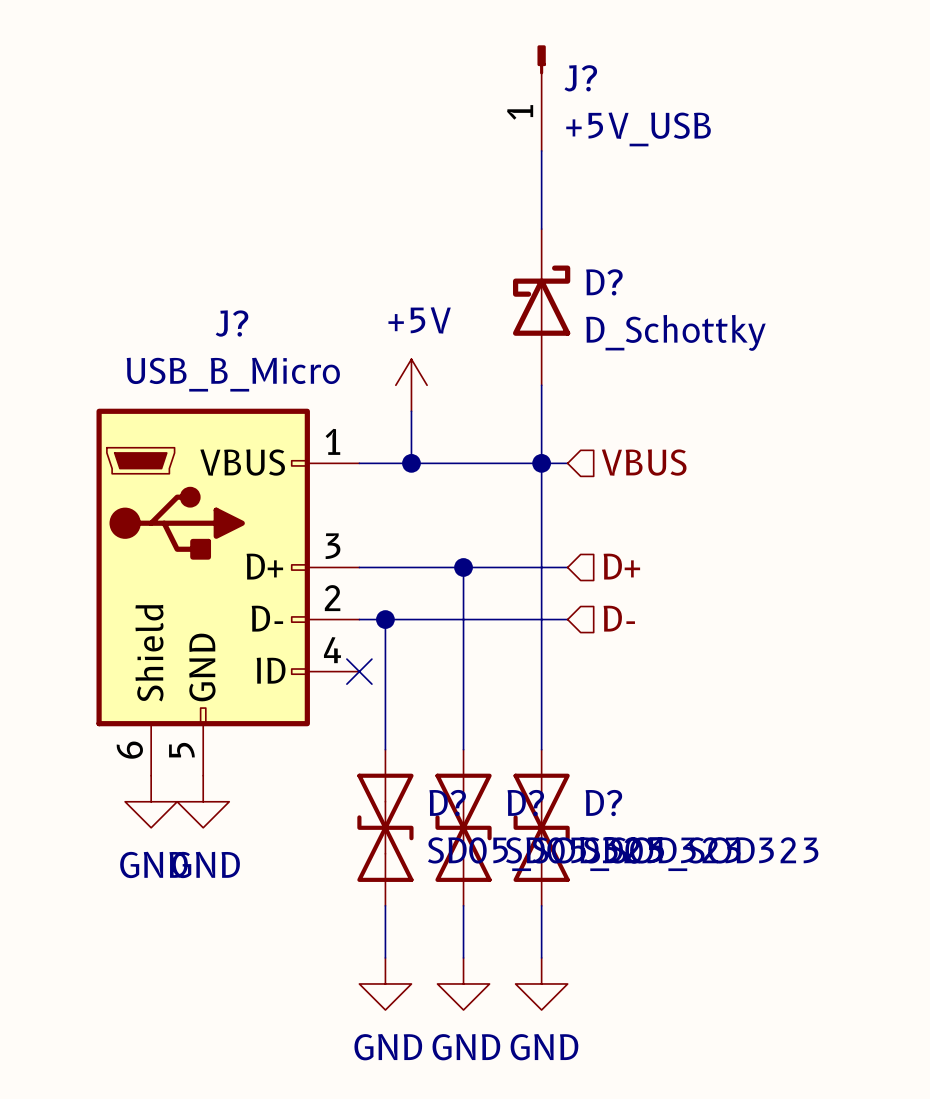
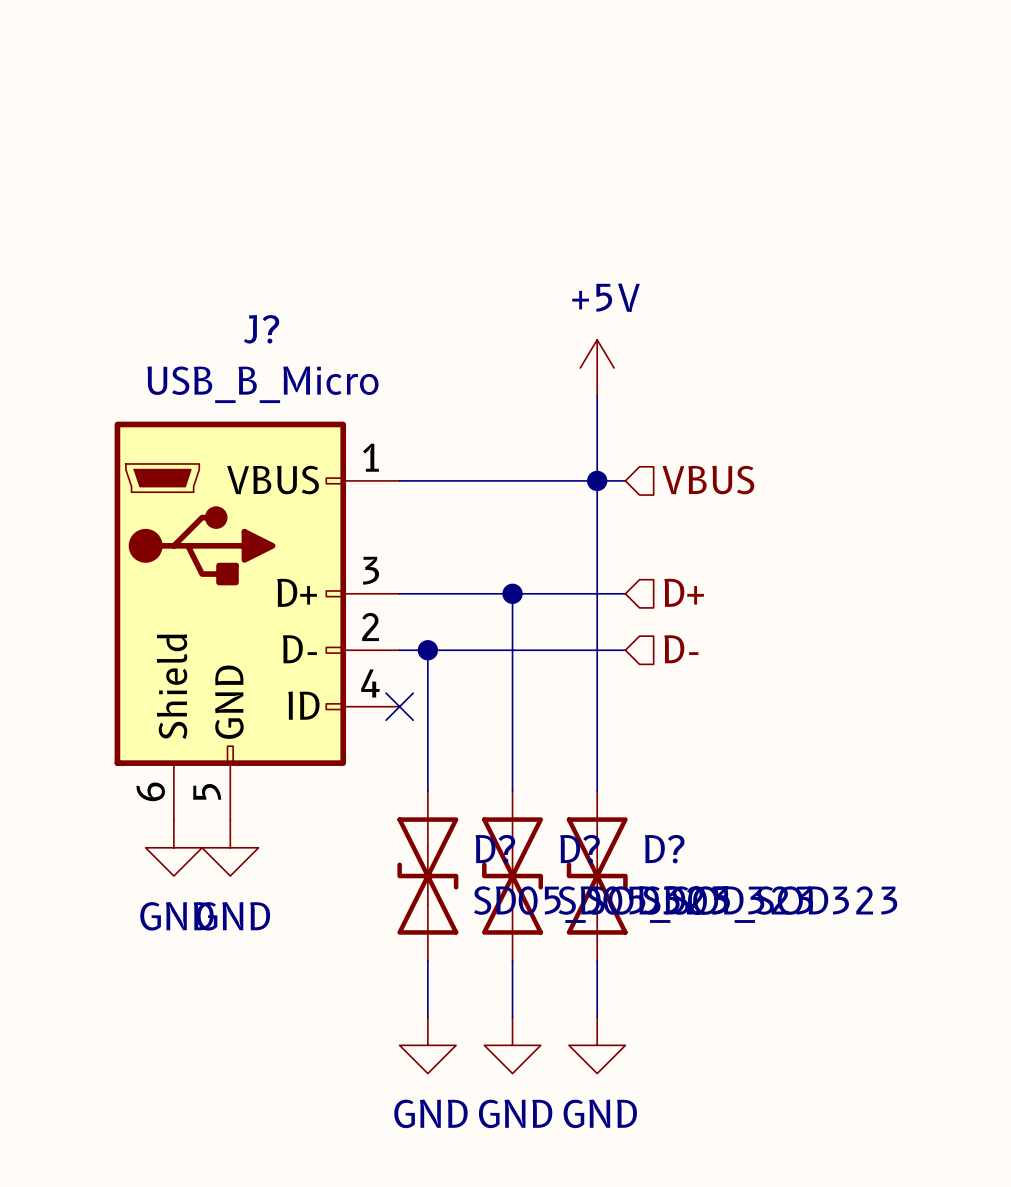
J?: +5V_USB (541, 98) -> none
wire: (541, 150) (541, 229) -> none
D?: D_Schottky (541, 307) -> none
power symbol position: +5V (411, 385) -> +5V (597, 368)
wire: (411, 411) (411, 463) -> none
junction: (411, 463) -> none

